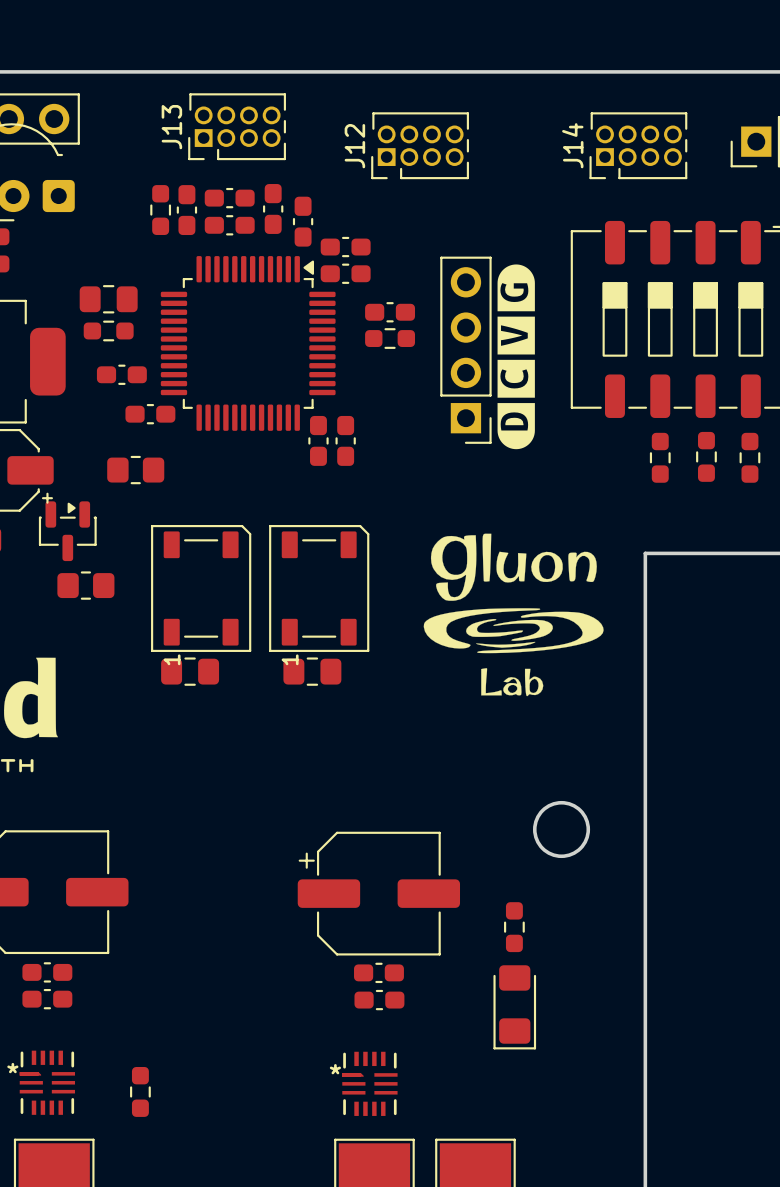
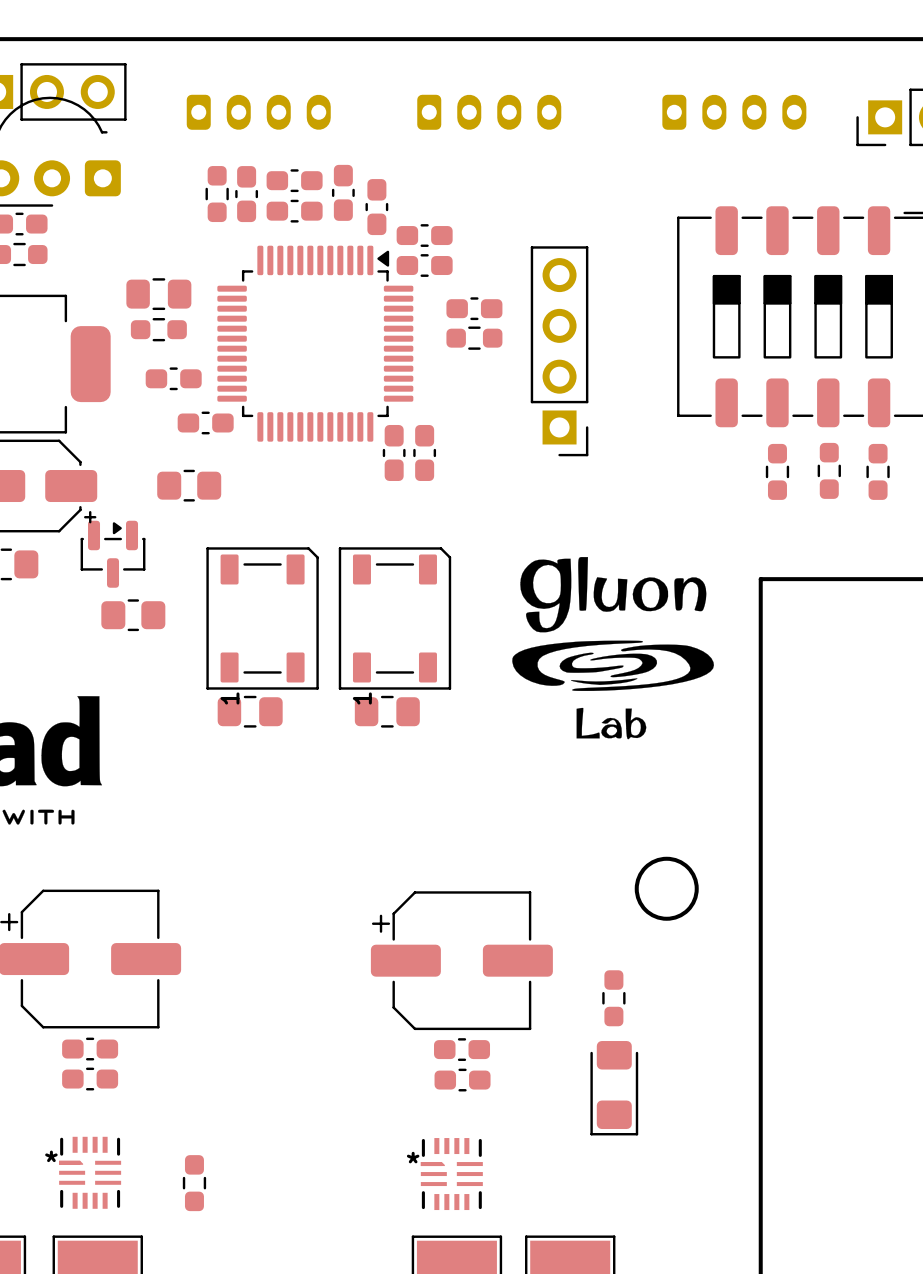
J13: (237, 126) -> none
part: none -> (258, 112)
part: none -> (489, 112)
part: none -> (734, 112)
J12: (420, 145) -> none
J14: (638, 145) -> none
drawing: [497, 264, 535, 450] -> none

